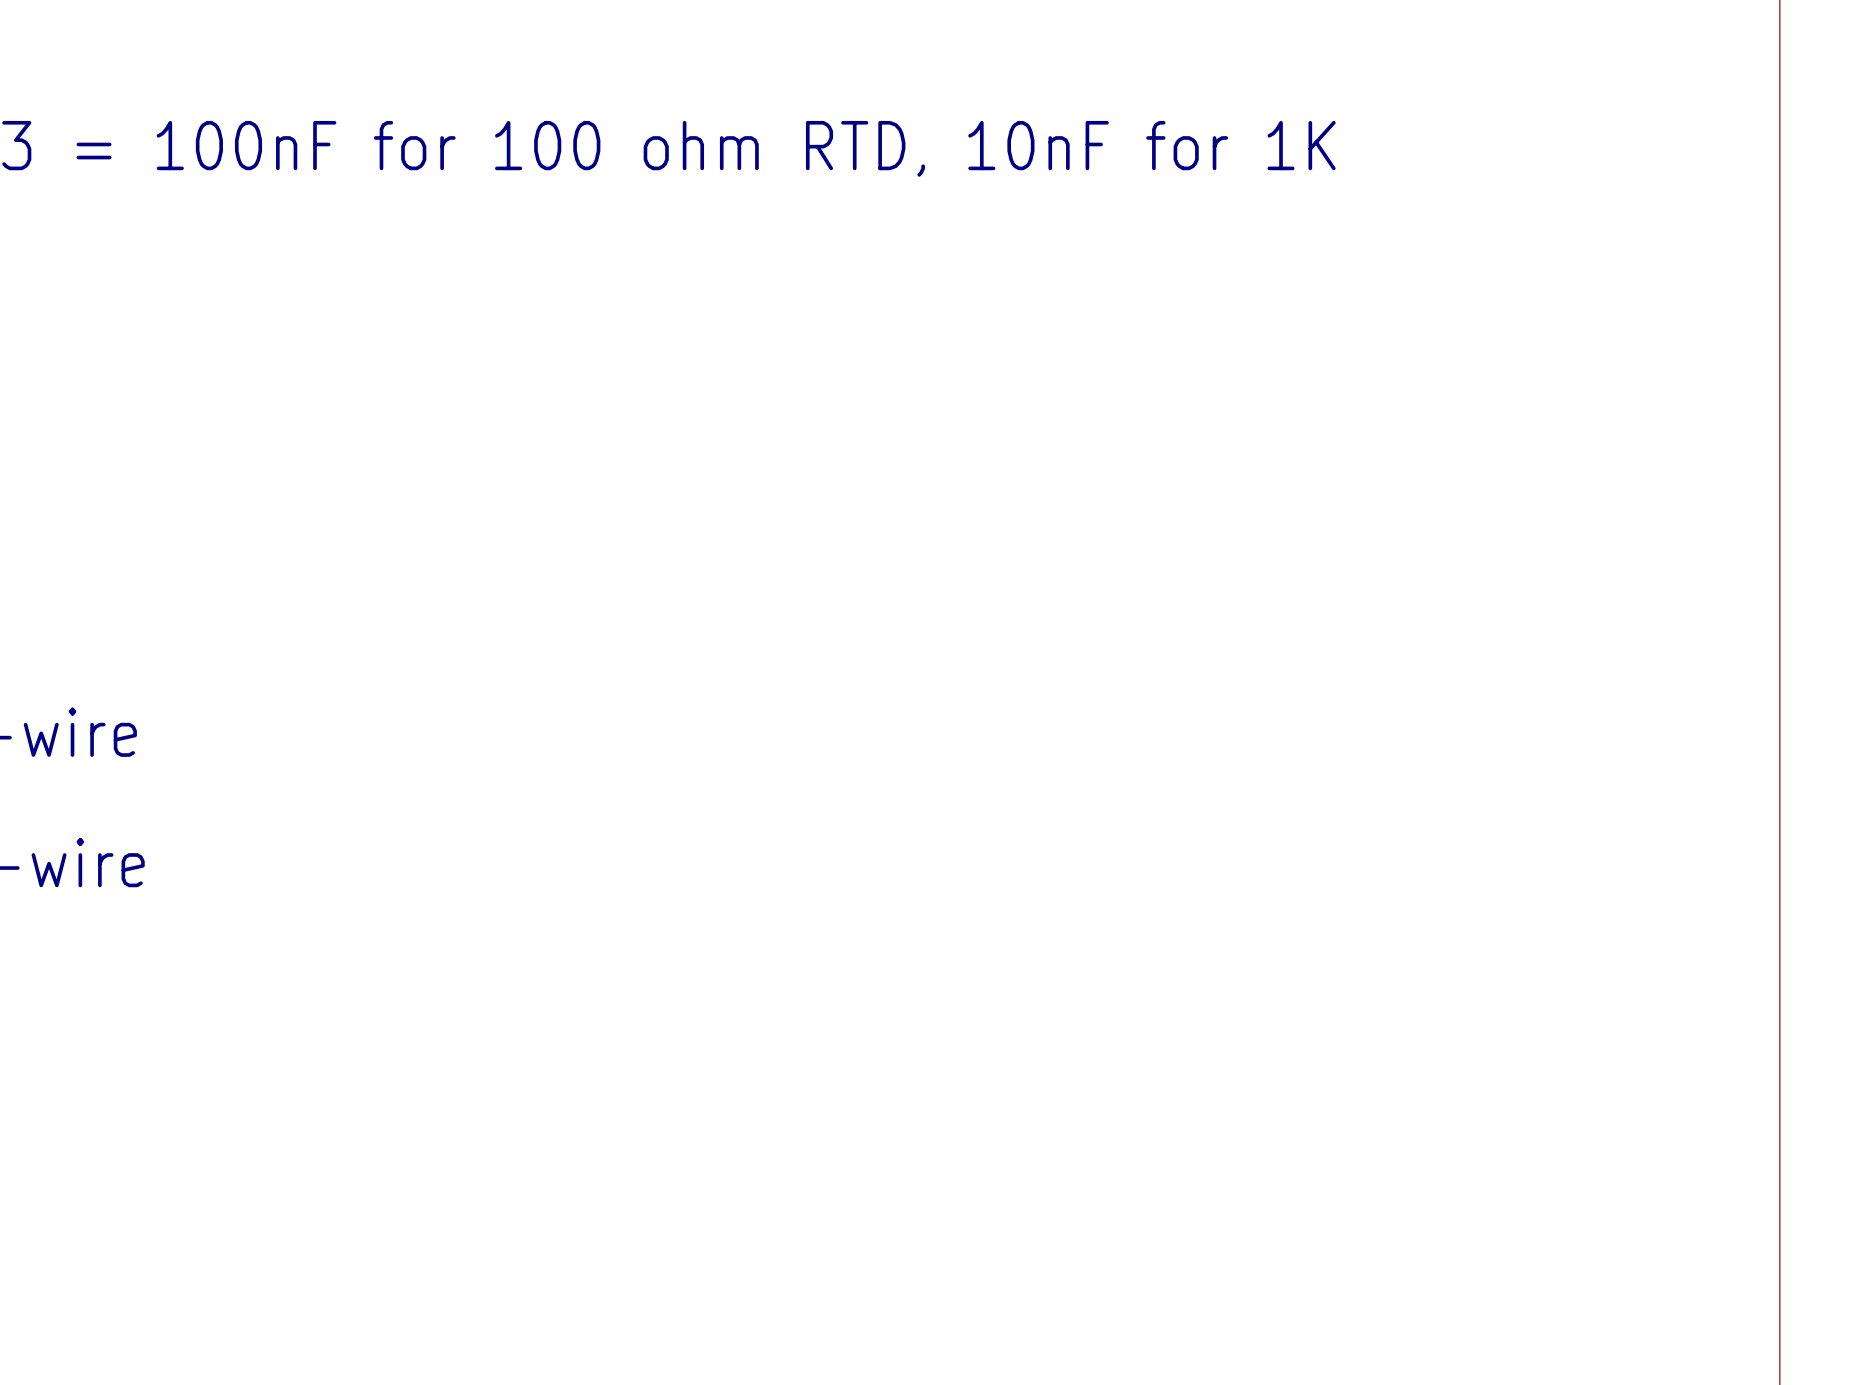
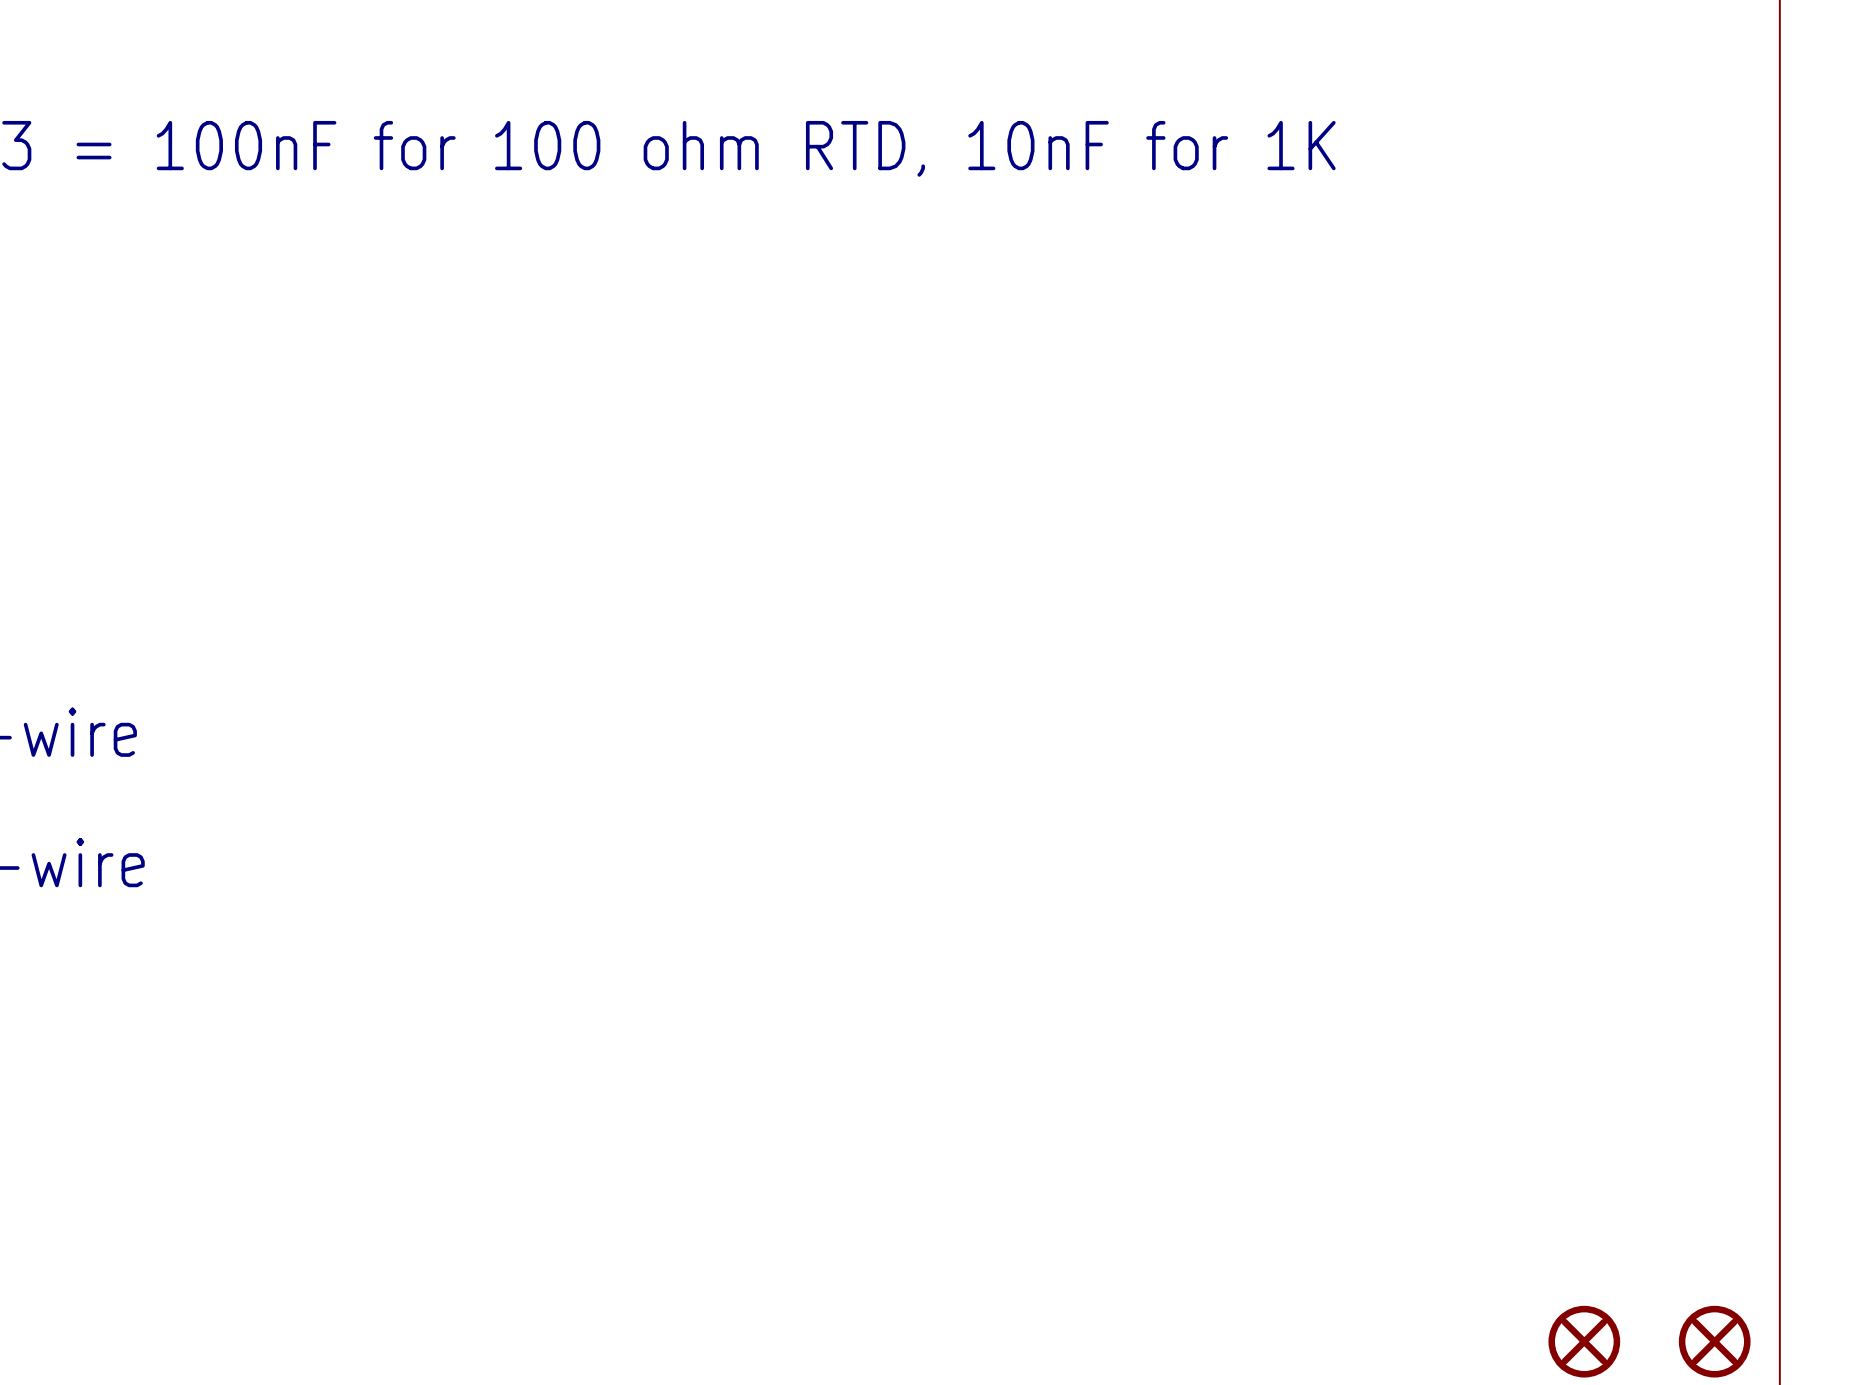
part: none -> (1584, 1341)
part: none -> (1714, 1341)

